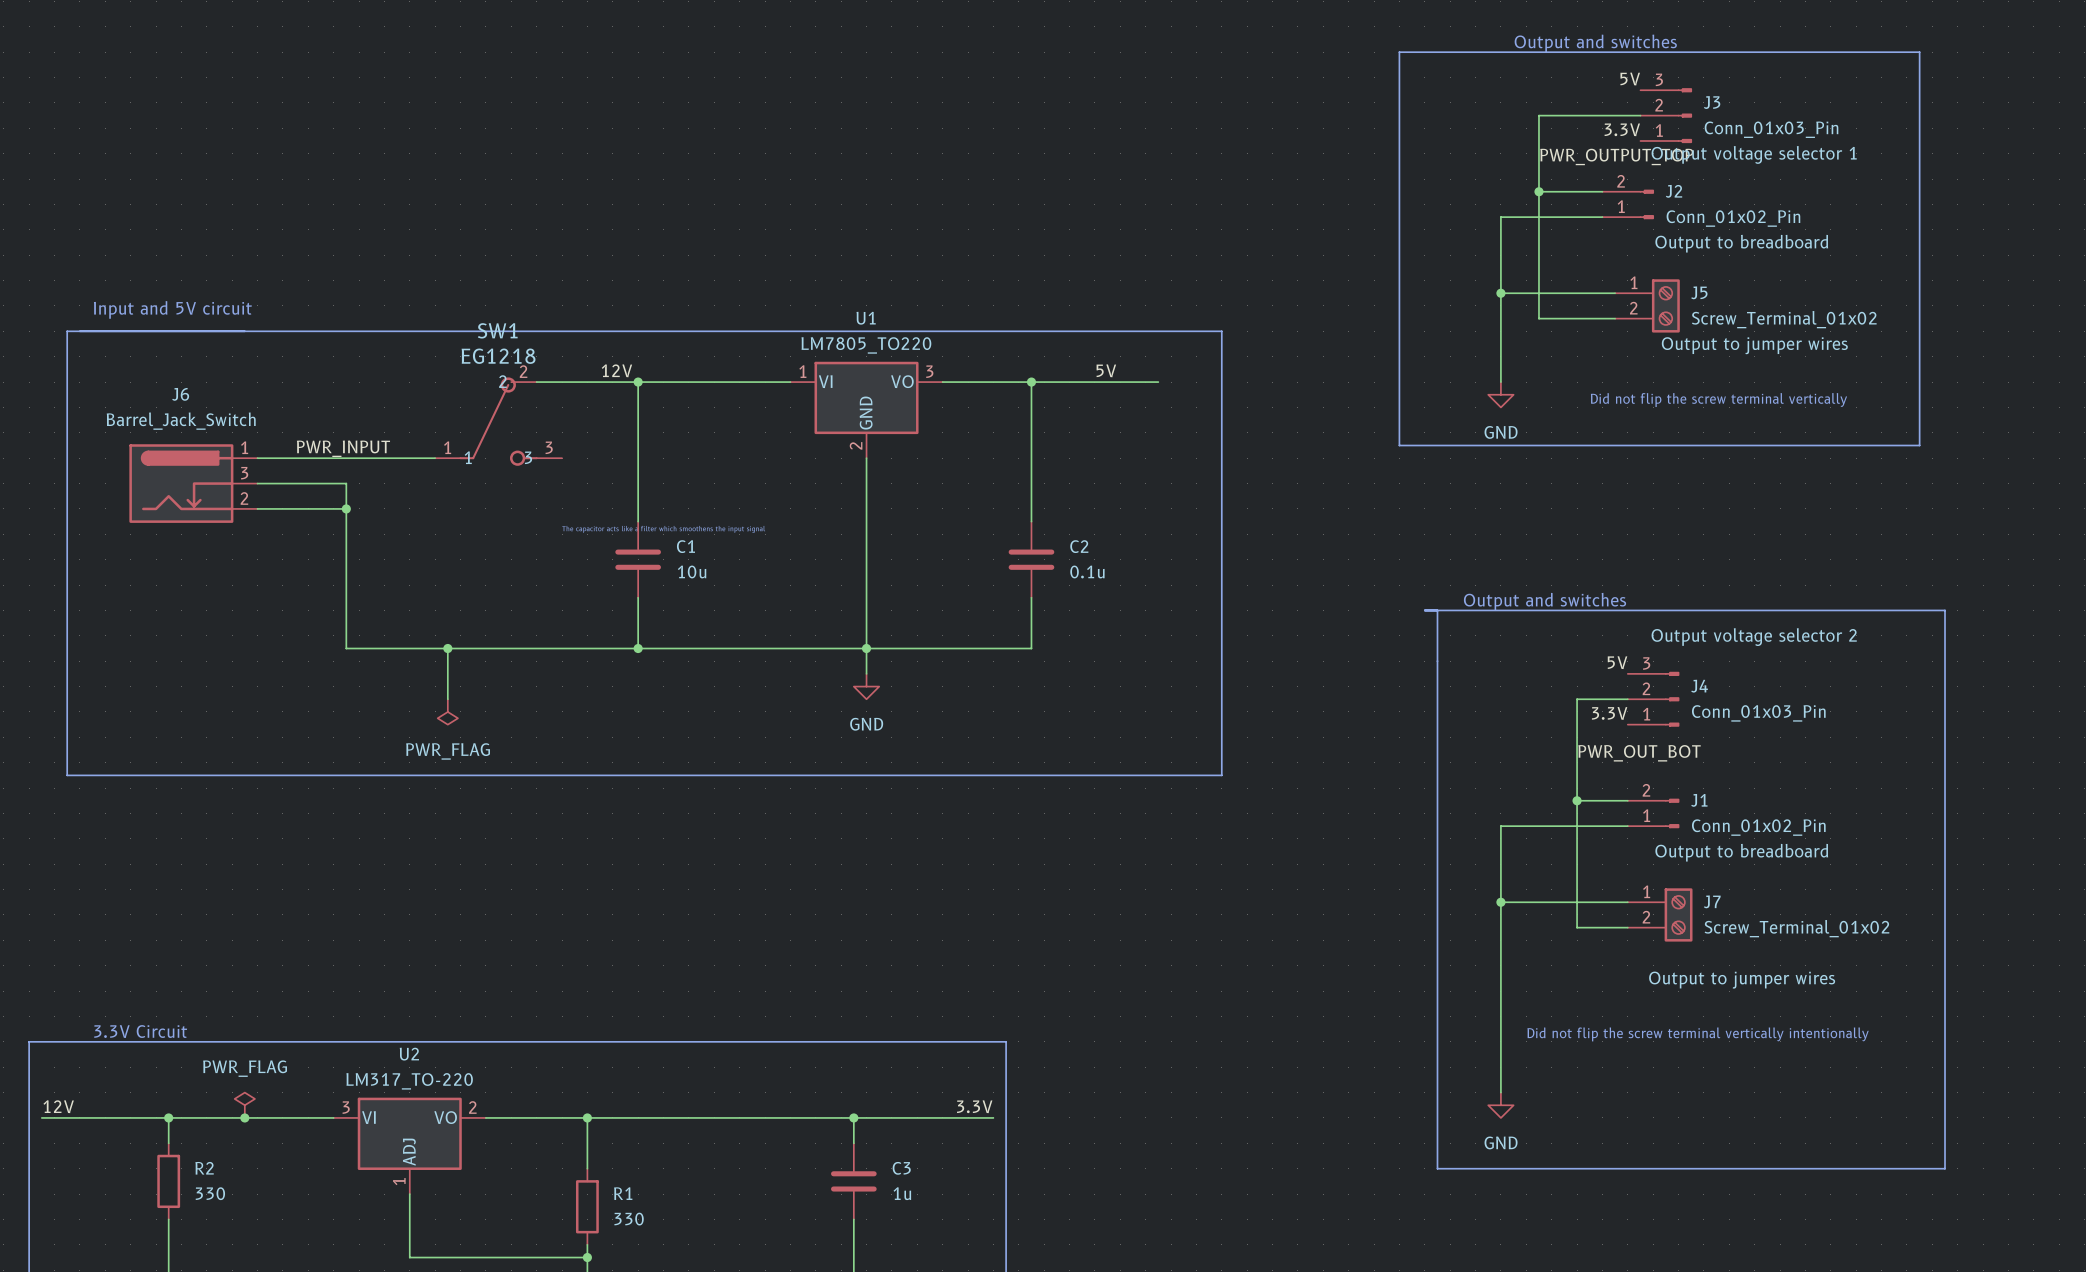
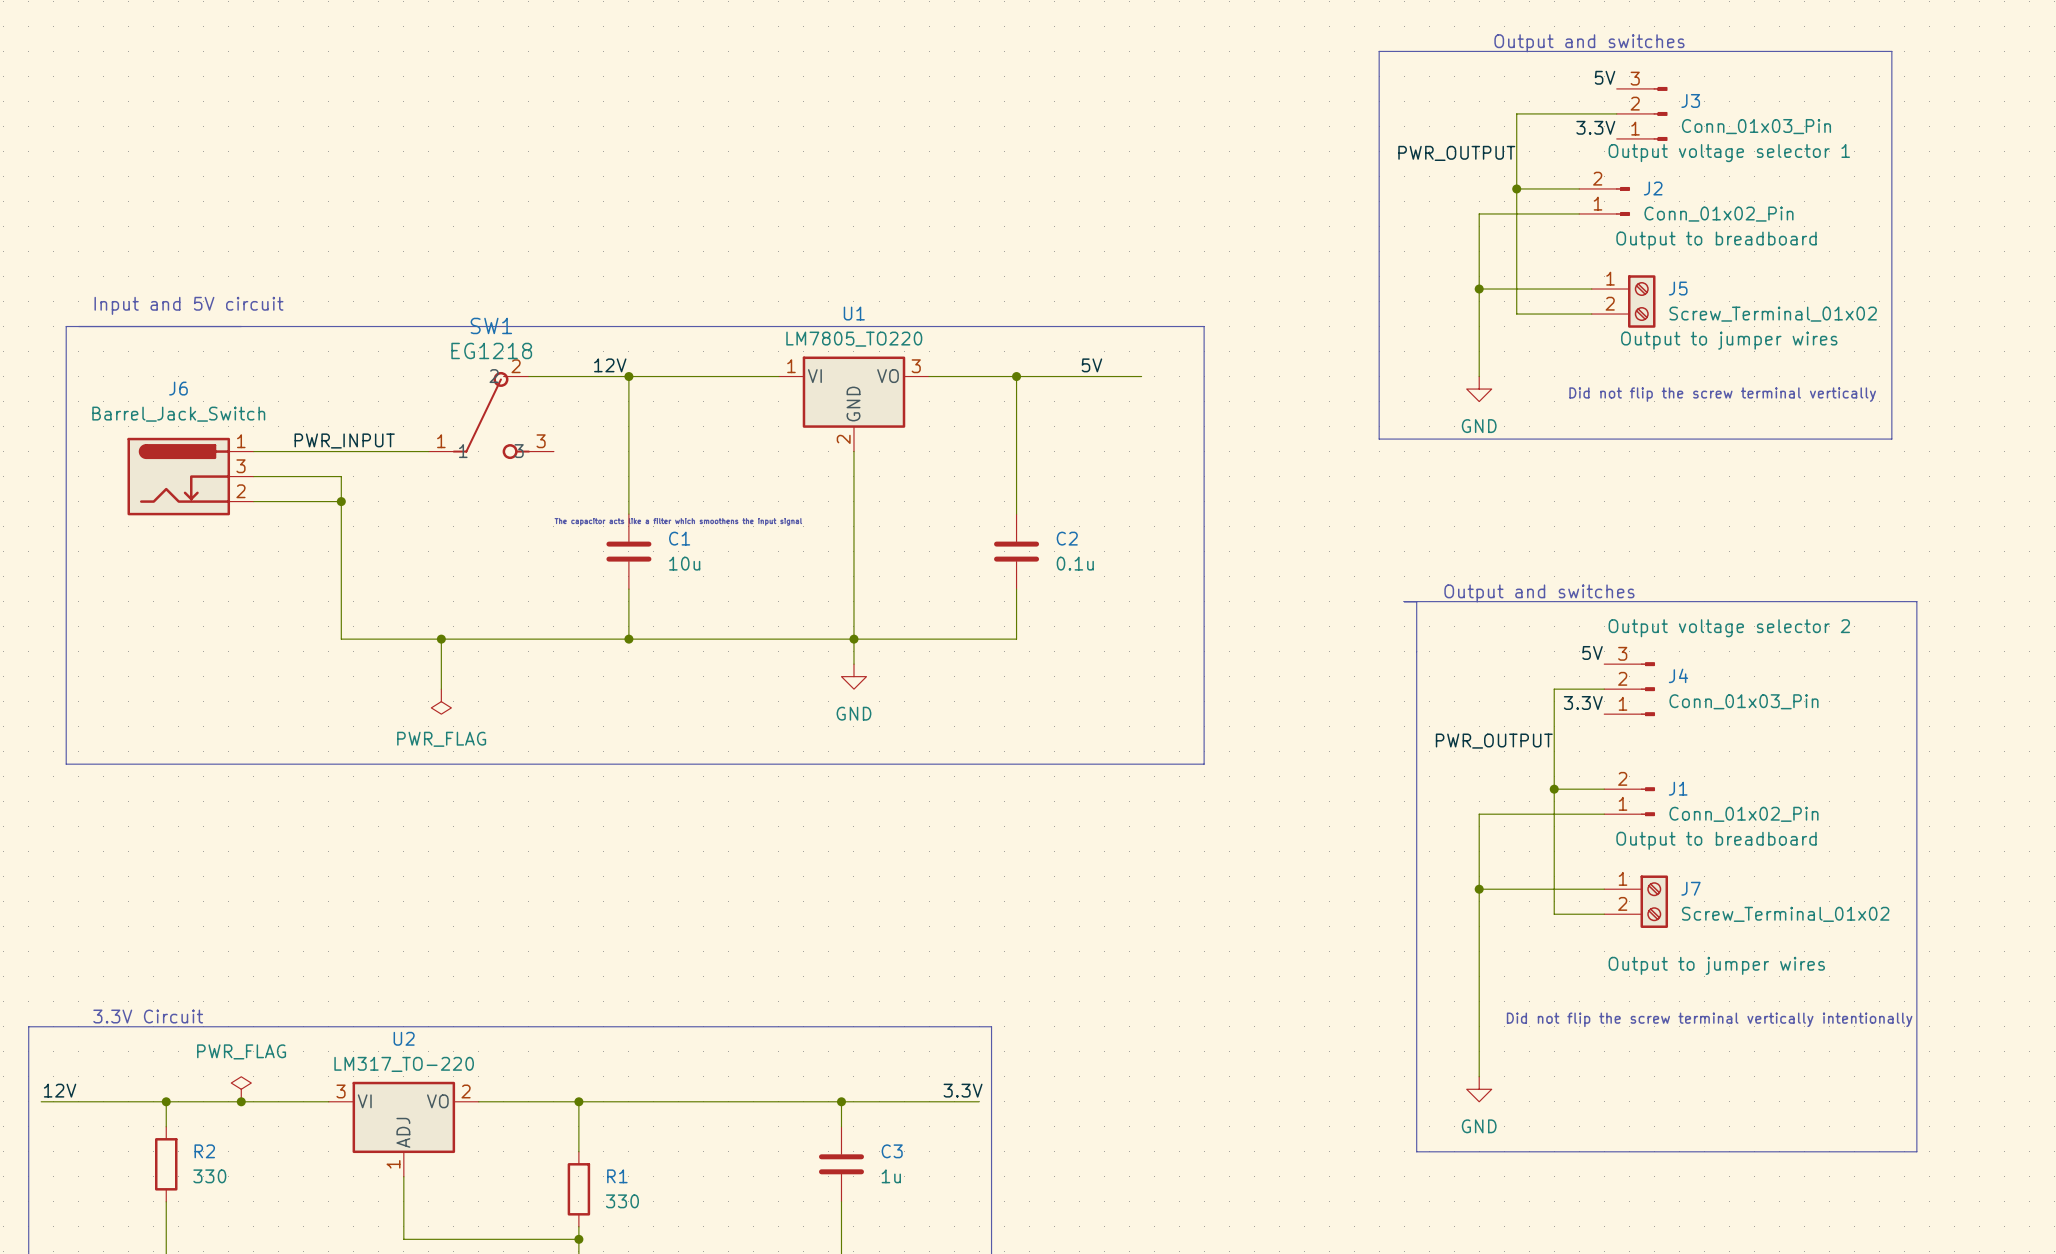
label: PWR_OUTPUT_TOP (1616, 156) -> PWR_OUTPUT (1456, 153)
label: PWR_OUT_BOT (1639, 753) -> PWR_OUTPUT (1494, 741)

